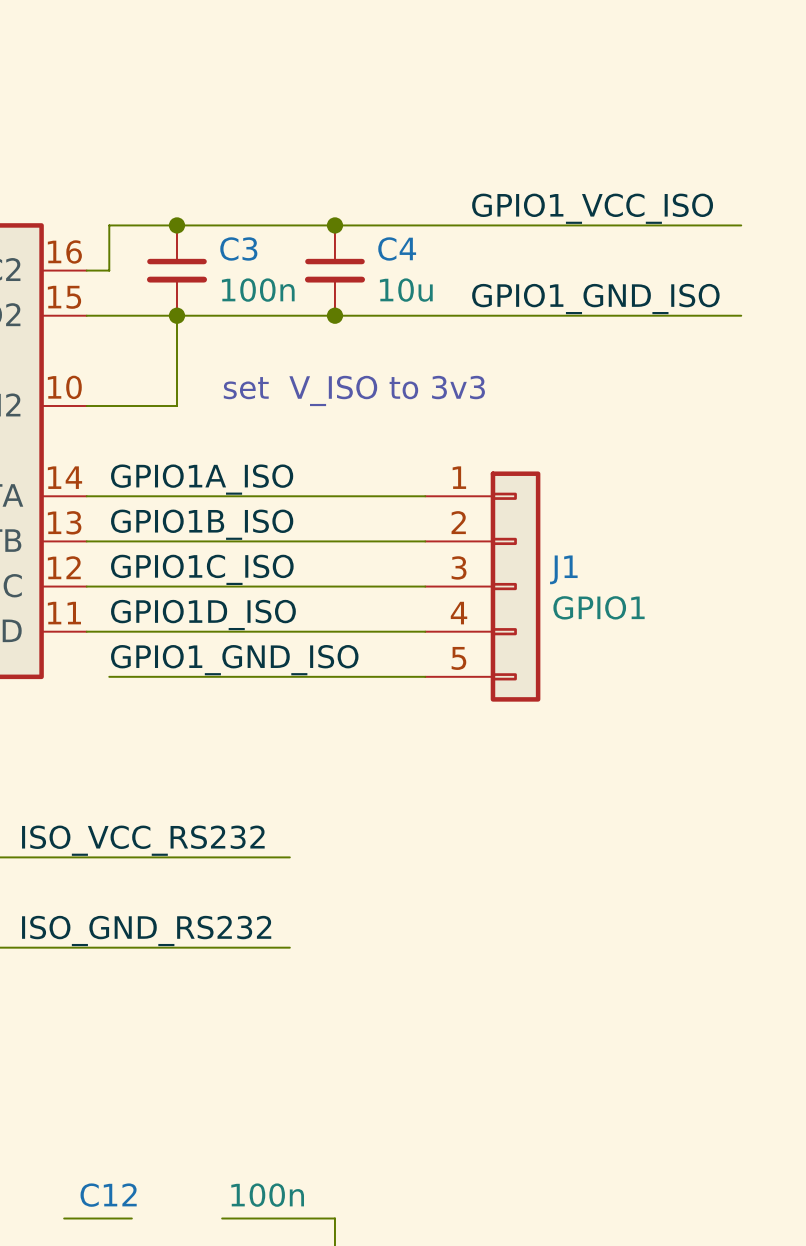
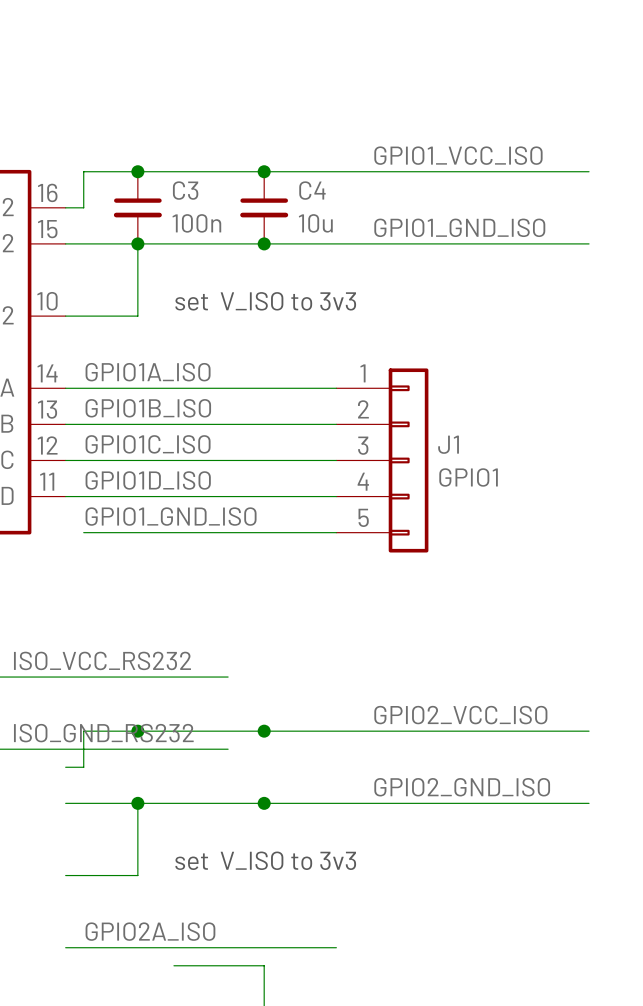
label: none -> GPIO2_VCC_ISO (460, 715)
junction: none -> (137, 731)
junction: none -> (264, 731)
wire: none -> (589, 731) (83, 731) (83, 767) (65, 767)
label: none -> GPIO2_GND_ISO (462, 787)
wire: none -> (65, 803) (589, 803)
wire: none -> (137, 803) (137, 875) (65, 875)
junction: none -> (137, 803)
junction: none -> (264, 803)
text: none -> set V_ISO to 3v3 (265, 860)
label: none -> GPIO2A_ISO (150, 931)
wire: none -> (65, 947) (336, 947)
C12: 100n (192, 1195) -> none
wire: (64, 1218) (131, 1218) -> none

